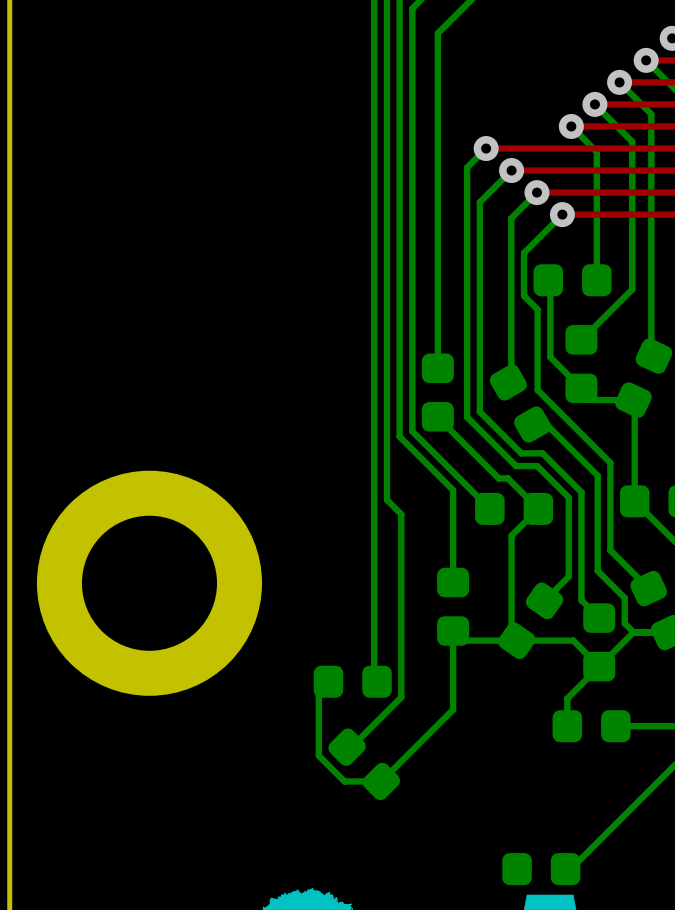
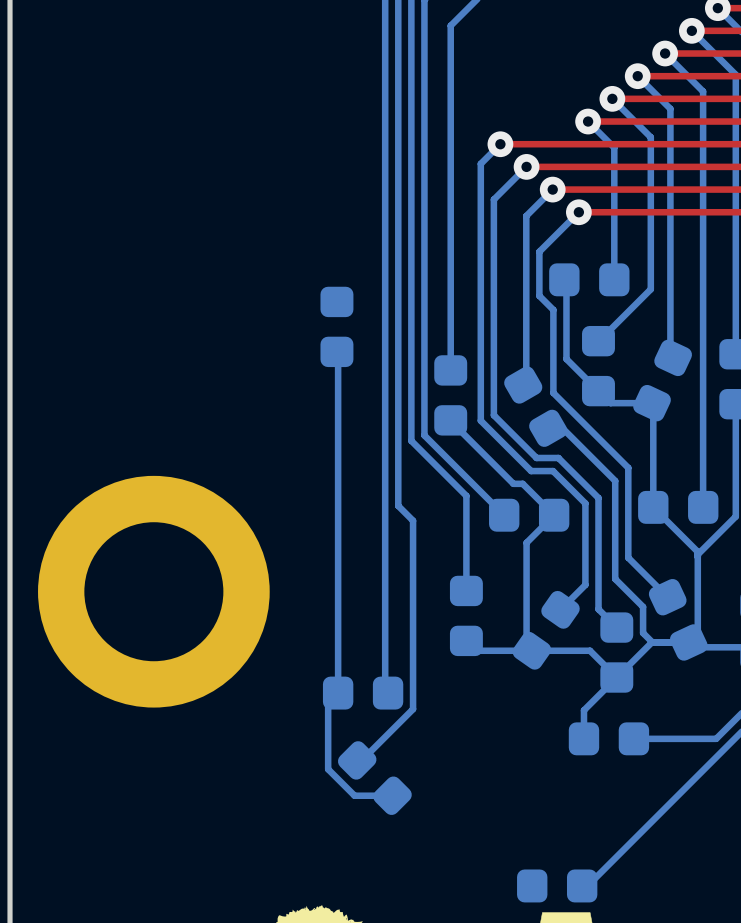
part: none -> (336, 326)
bottom track: none -> (336, 351) (338, 693)
bottom track: (453, 631) (453, 709) (381, 781) -> none

